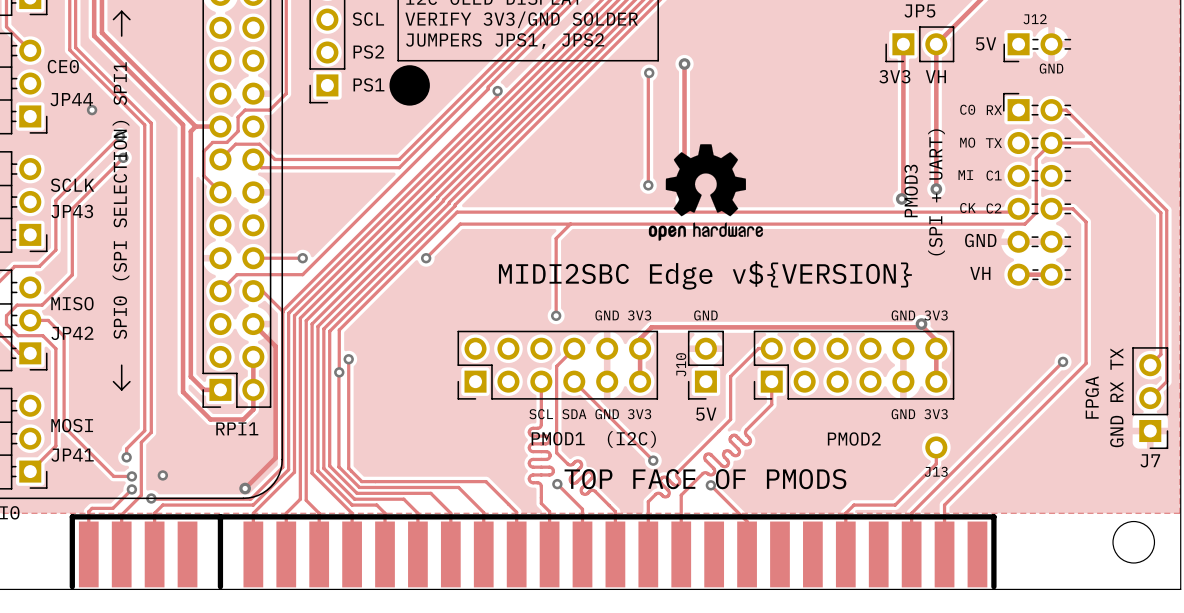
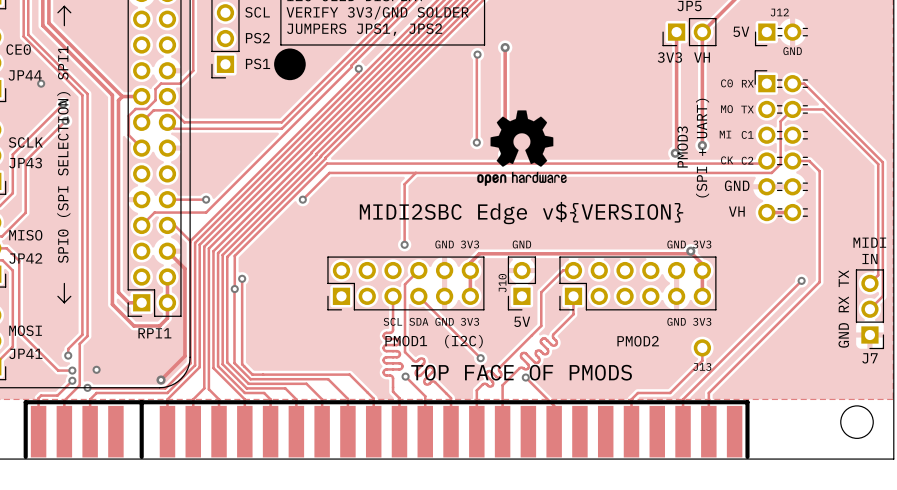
text: none -> MIDI (869, 242)
text: none -> IN (869, 259)
text: FPGA (1092, 397) -> none

